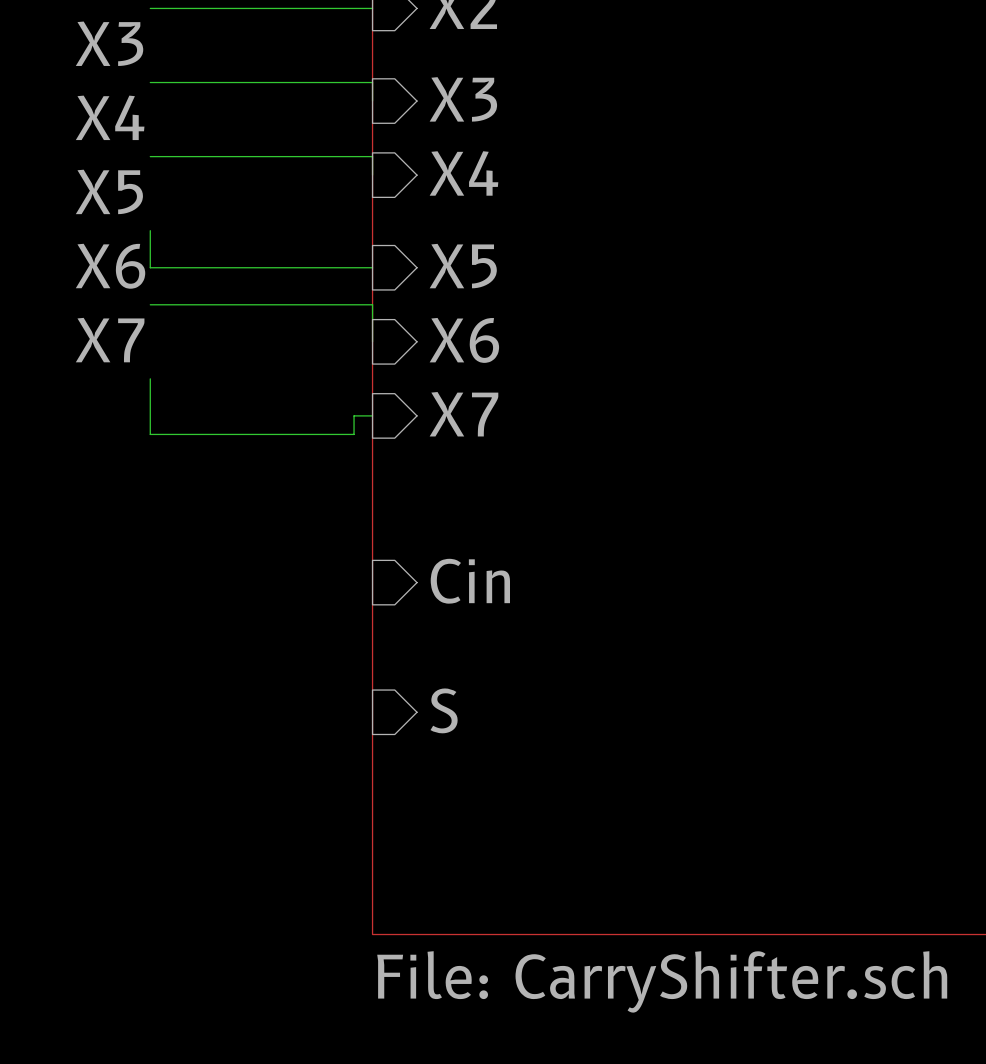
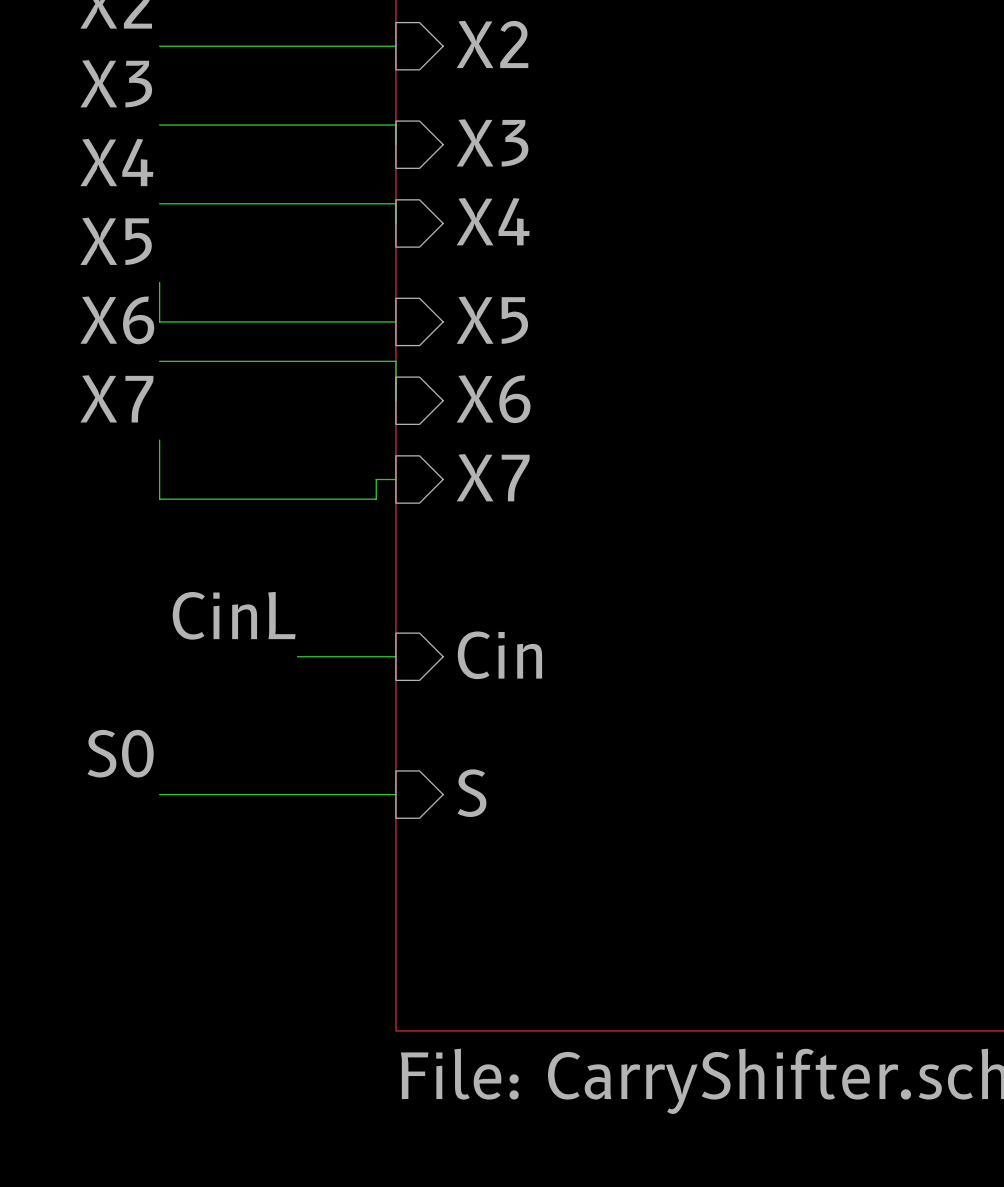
label: none -> CinL (234, 615)
wire: none -> (297, 656) (395, 656)
label: none -> S0 (120, 753)
wire: none -> (159, 794) (395, 794)

